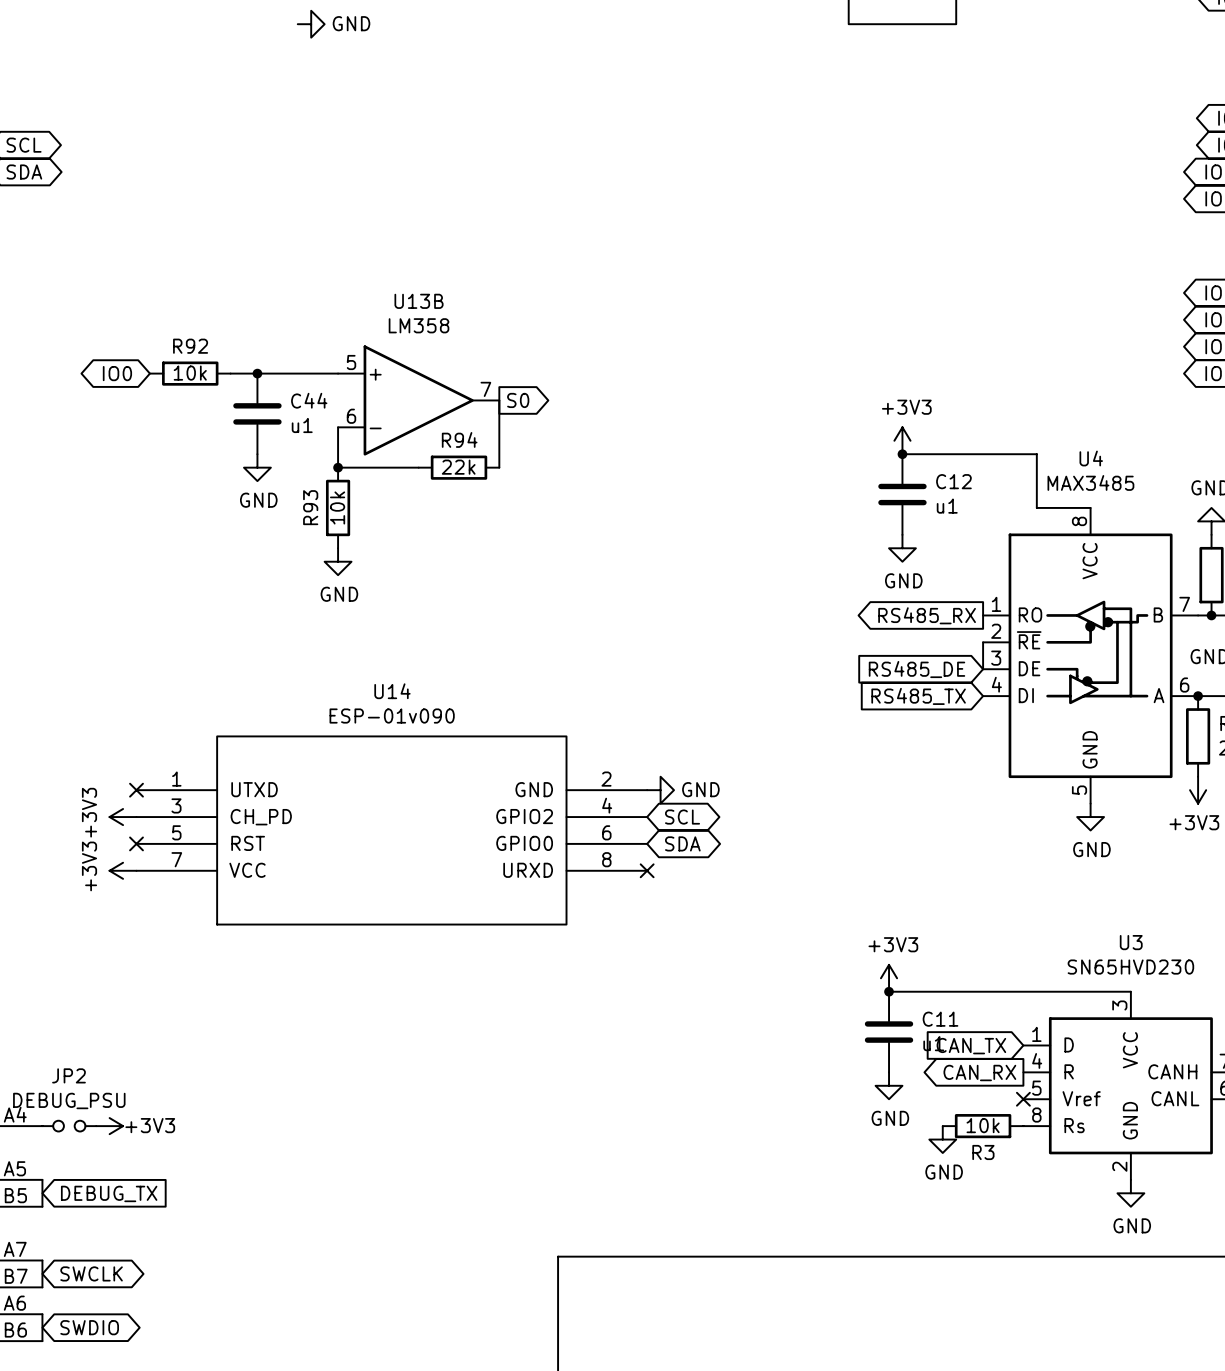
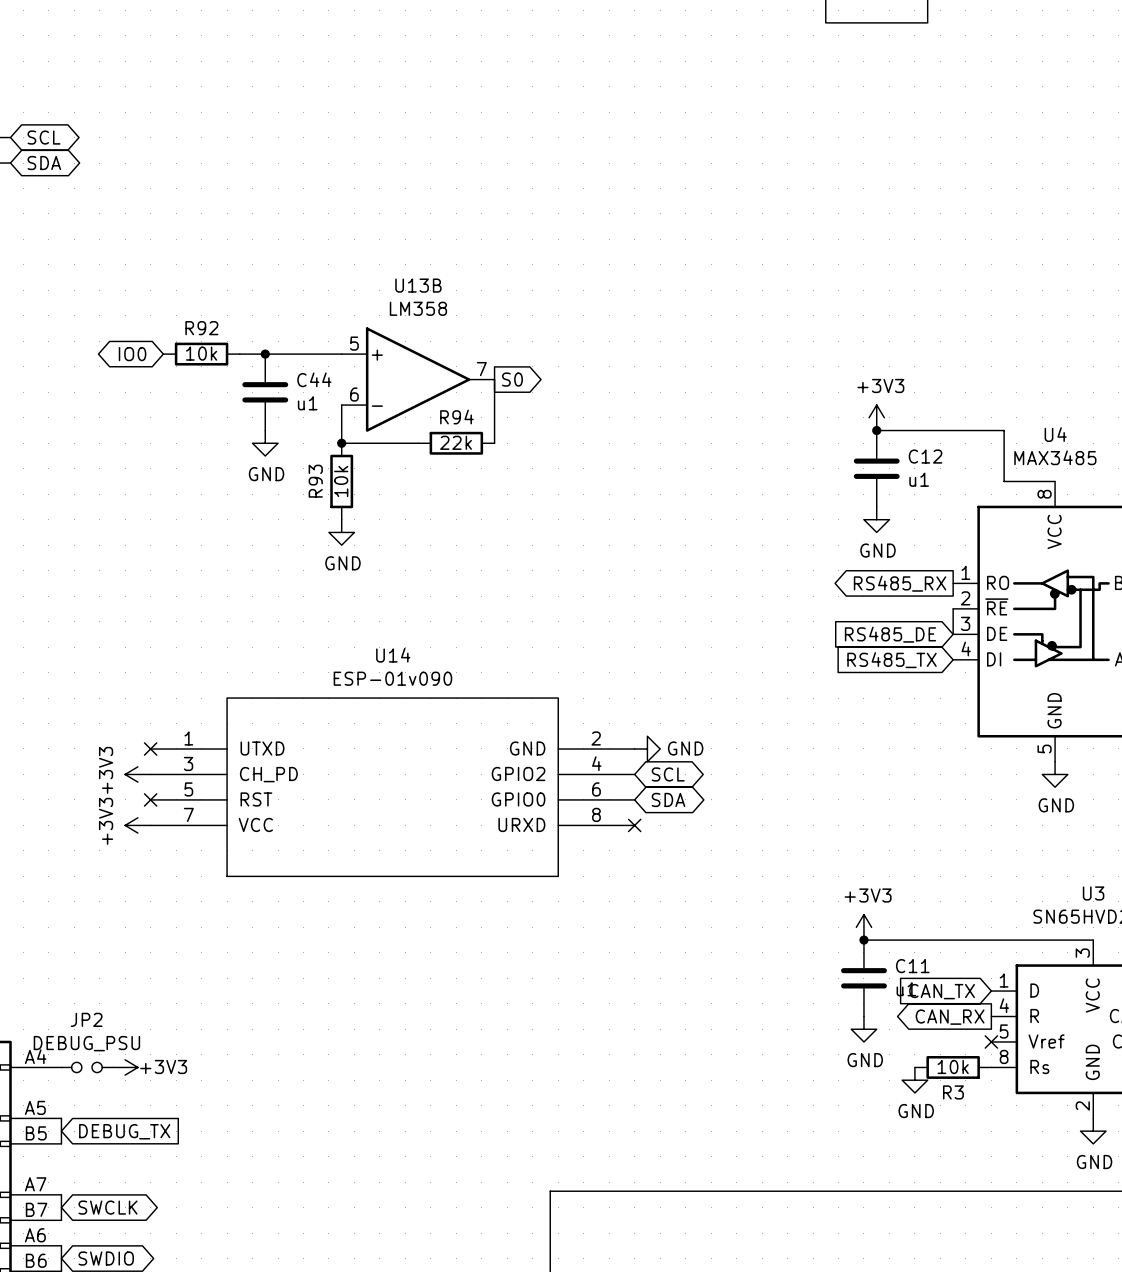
power symbol: GND (311, 24) -> none

